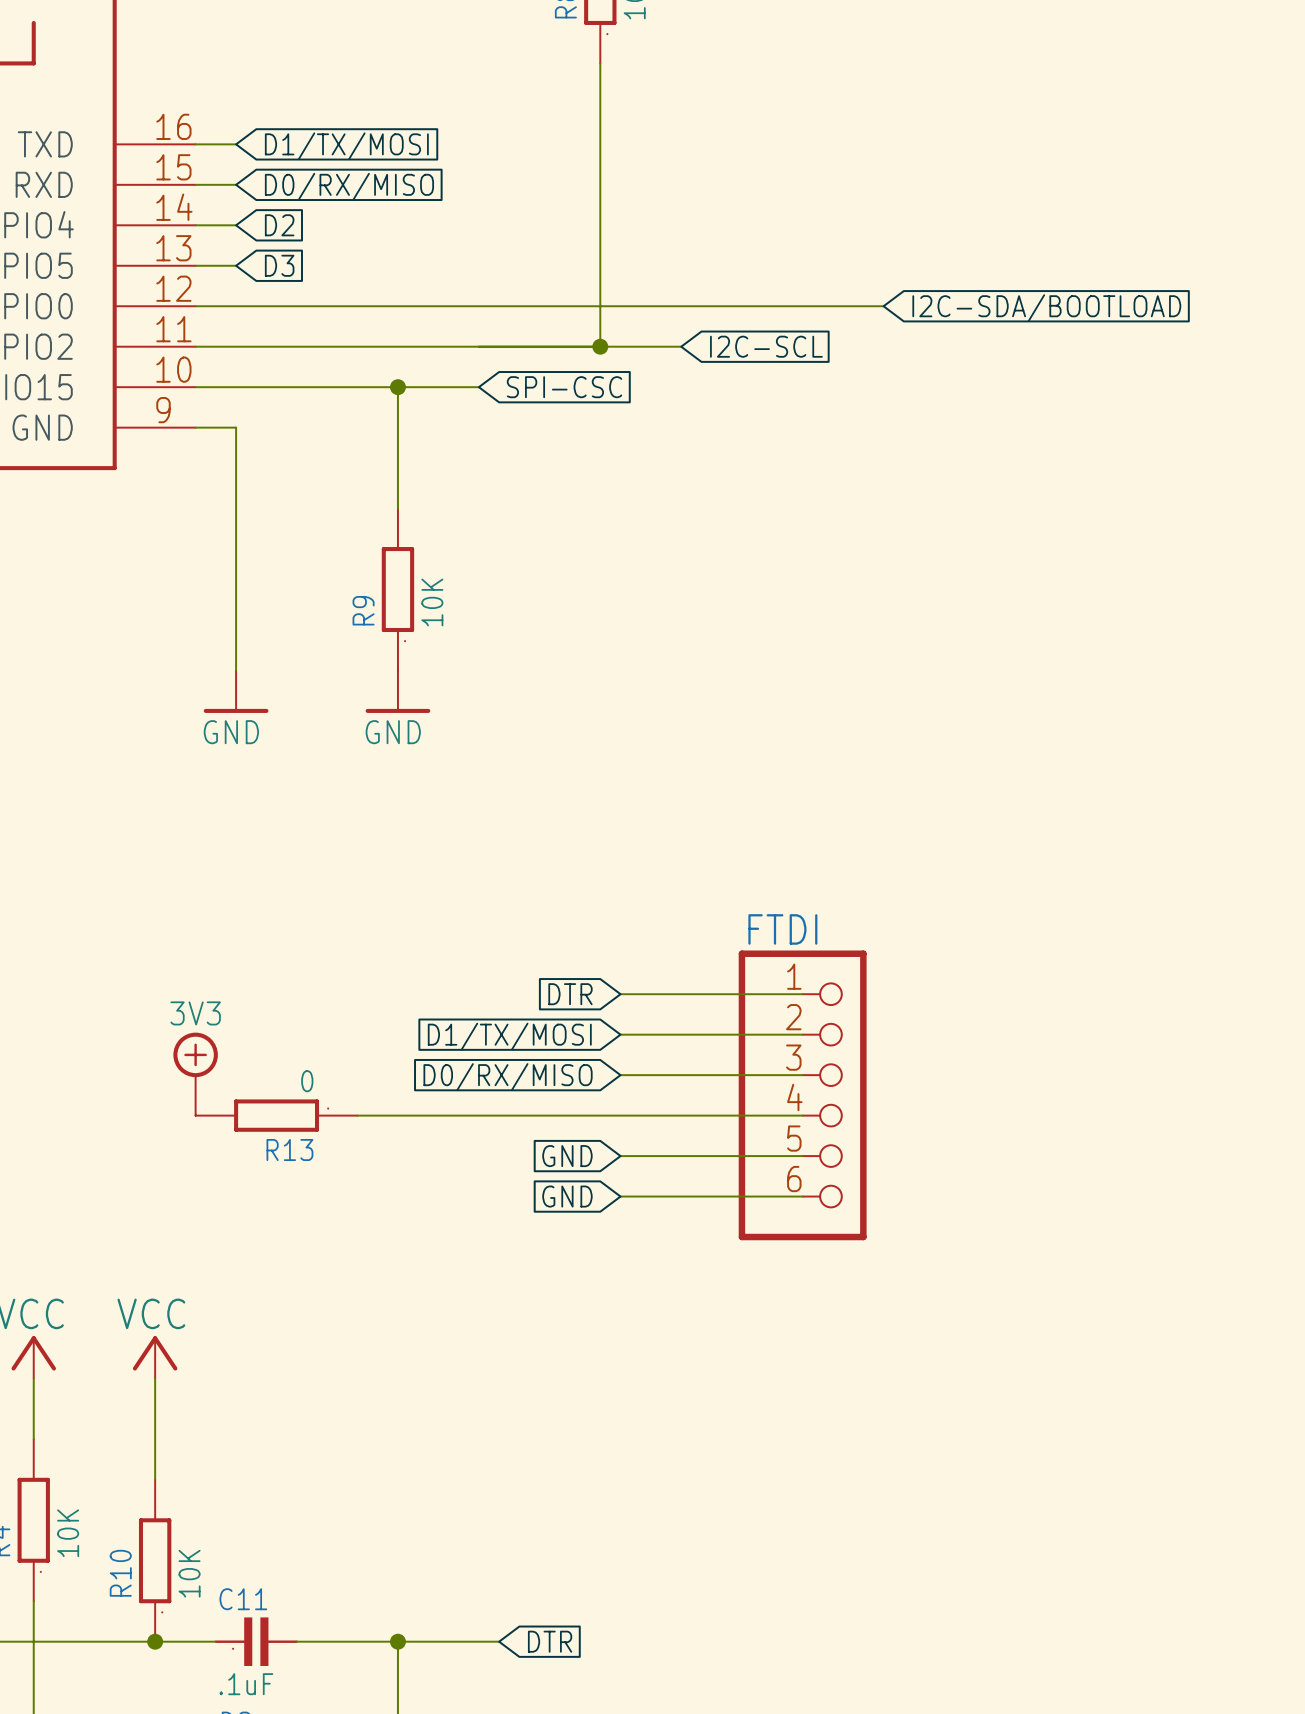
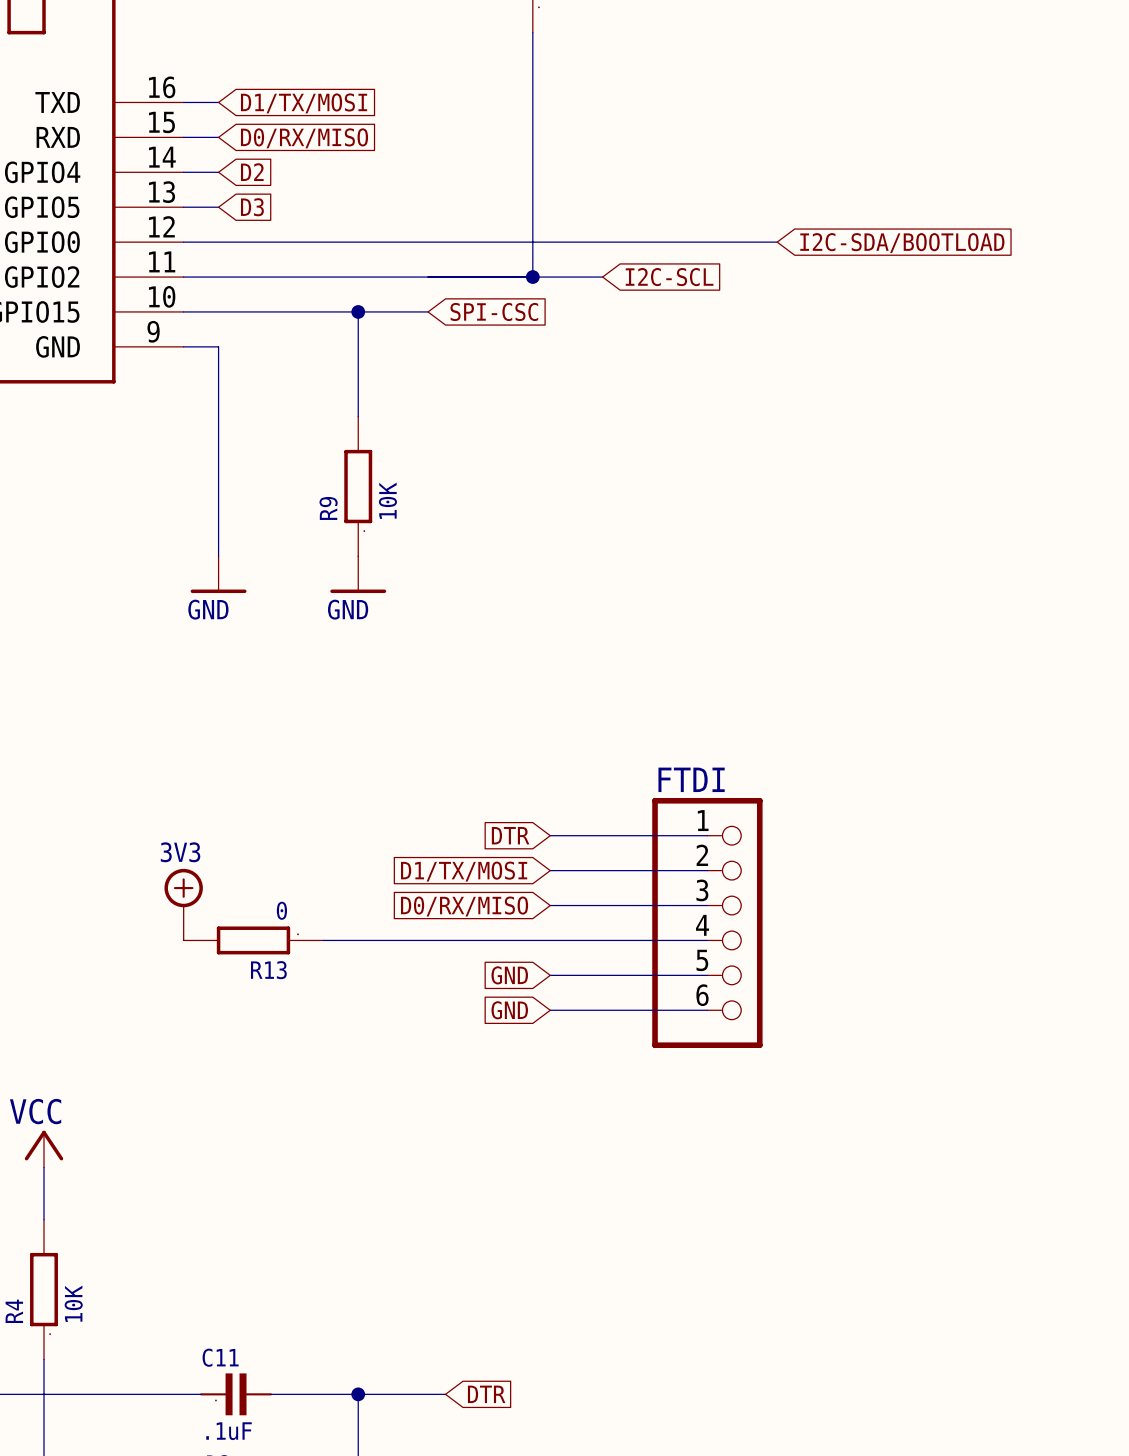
power symbol: VCC (155, 1357) -> none
wire: (155, 1378) (155, 1479) -> none
R10: 10K (155, 1560) -> none
junction: (155, 1641) -> none

